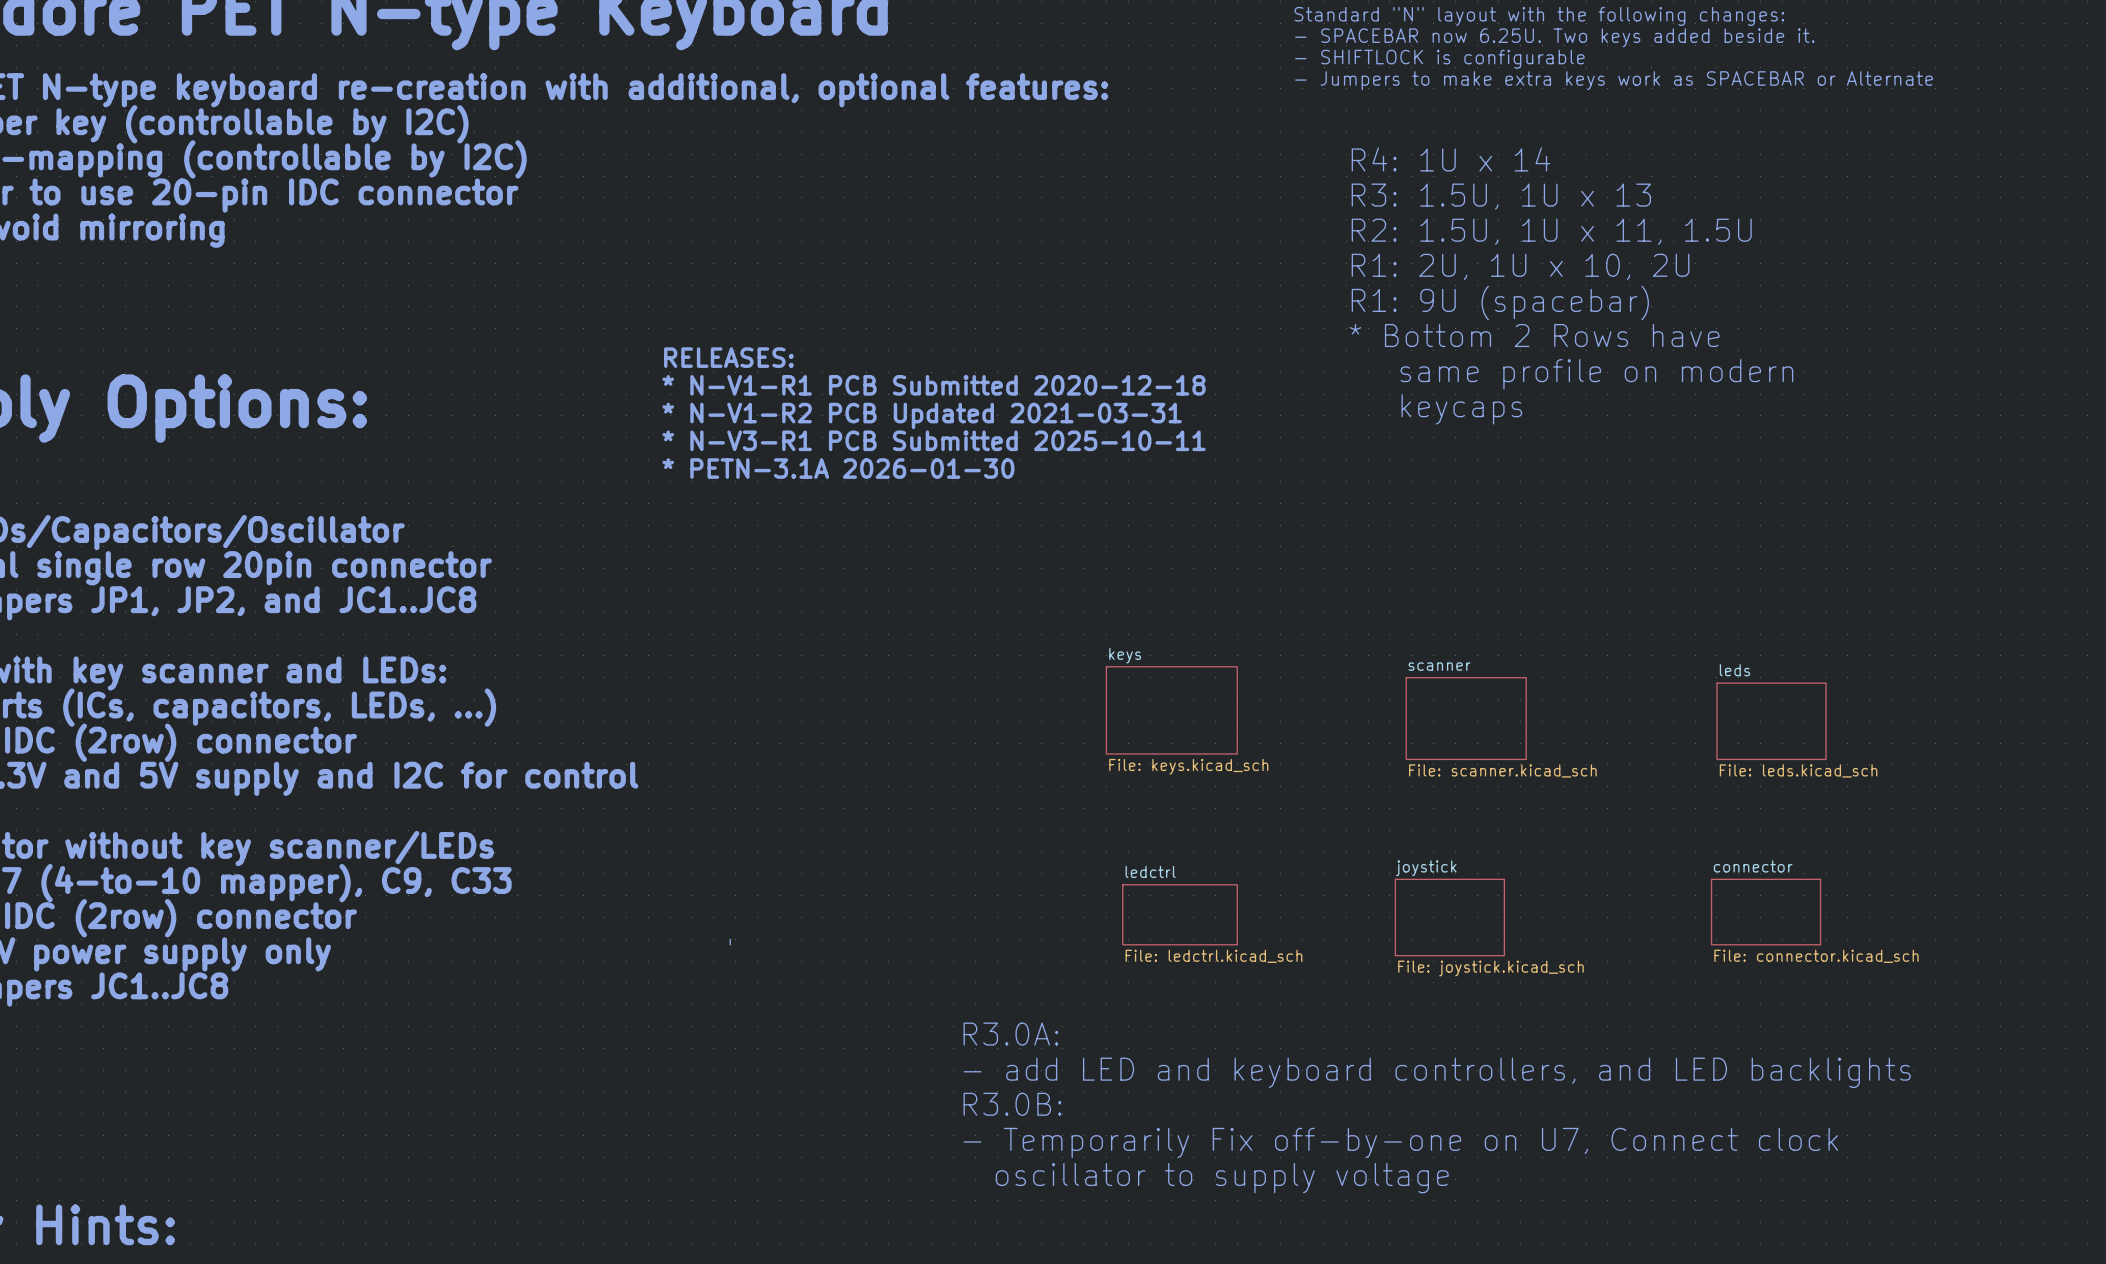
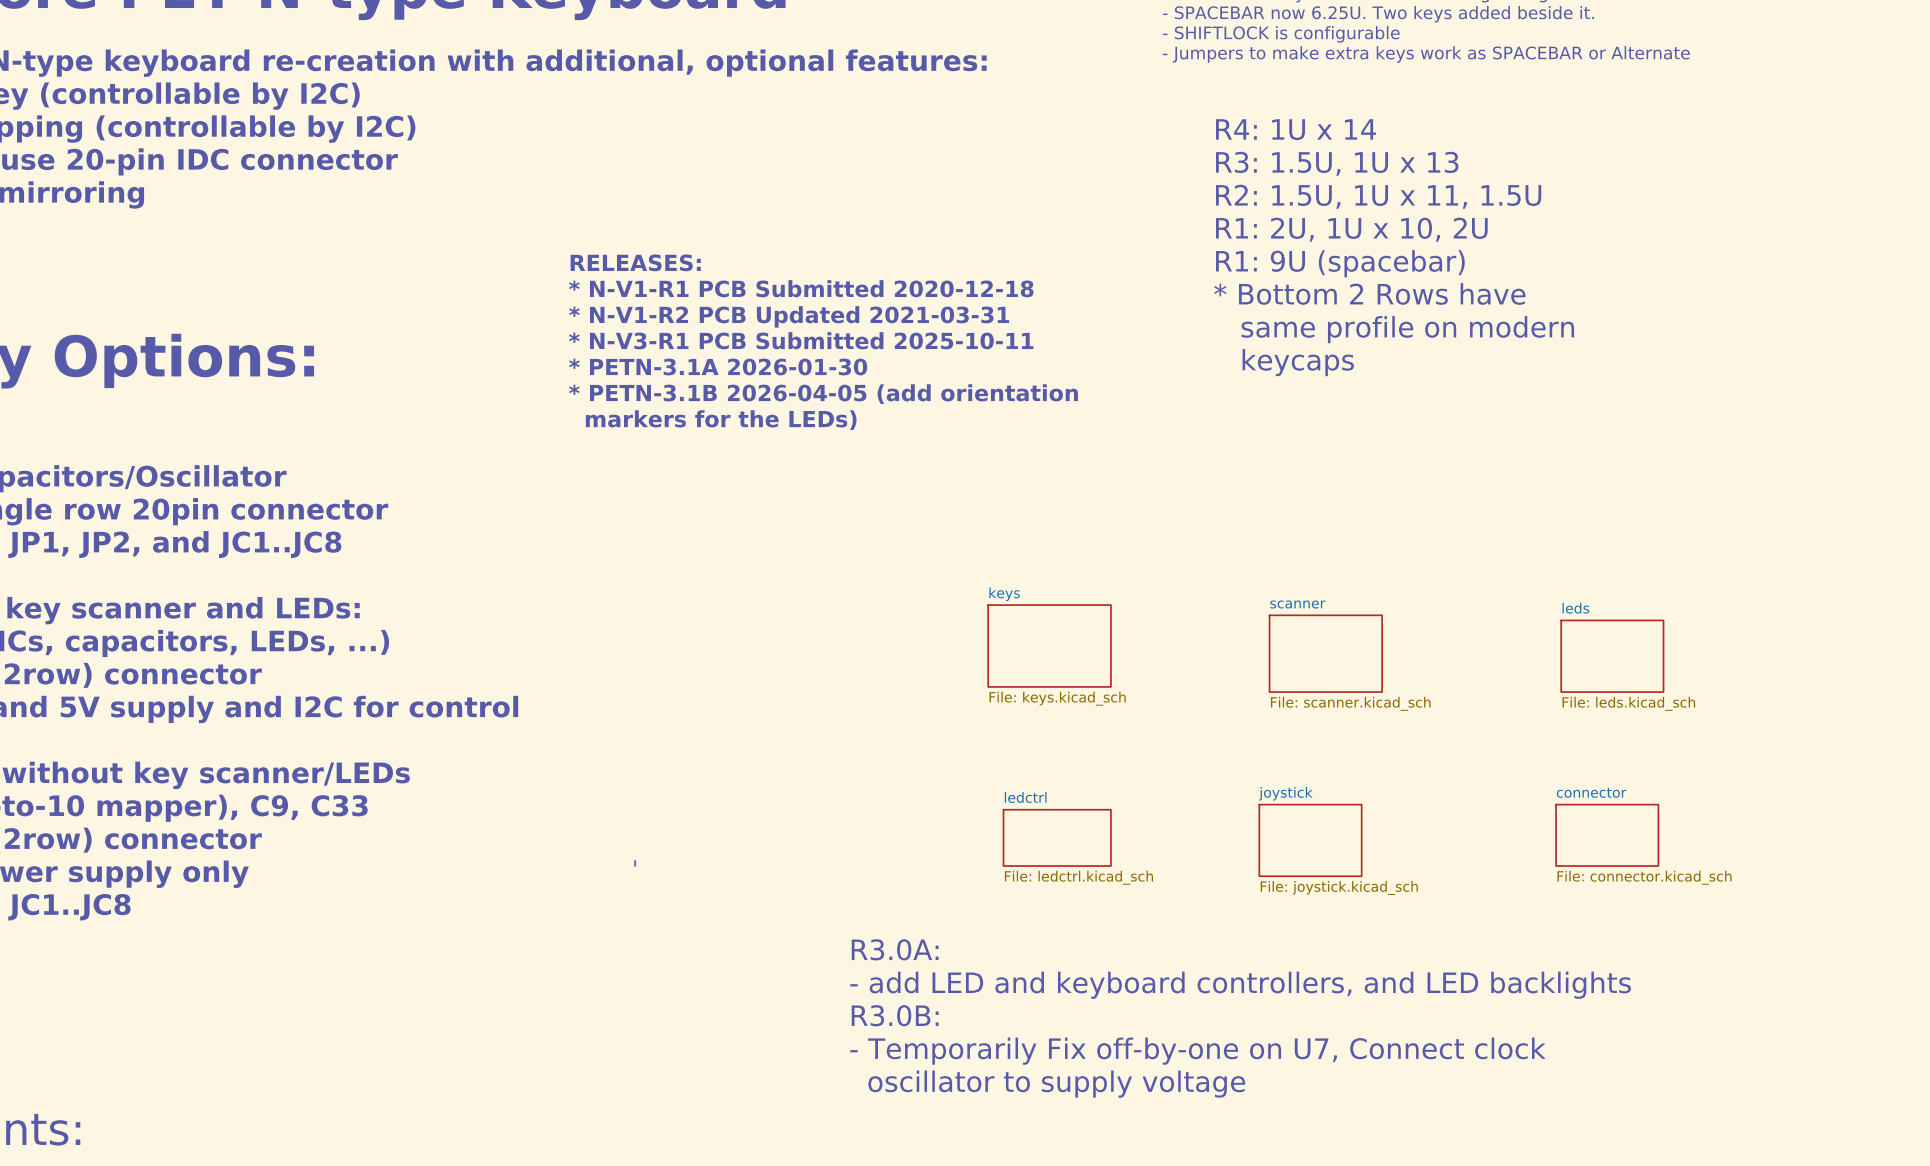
text: none -> RELEASES: (635, 262)
text: none -> * N-V1-R1 PCB Submitted 2020-12-18 (801, 288)
text: RELEASES: (728, 357) -> * N-V1-R2 PCB Updated 2021-03-31 (789, 316)
text: * N-V1-R1 PCB Submitted 2020-12-18 (934, 385) -> * N-V3-R1 PCB Submitted 2025-10-11 (801, 340)
text: * N-V1-R2 PCB Updated 2021-03-31 (922, 415) -> * PETN-3.1A 2026-01-30 (718, 366)
text: * N-V3-R1 PCB Submitted 2025-10-11 (934, 440) -> * PETN-3.1B 2026-04-05 (add orientation (823, 394)
text: * PETN-3.1A 2026-01-30 (838, 468) -> markers for the LEDs) (721, 420)

